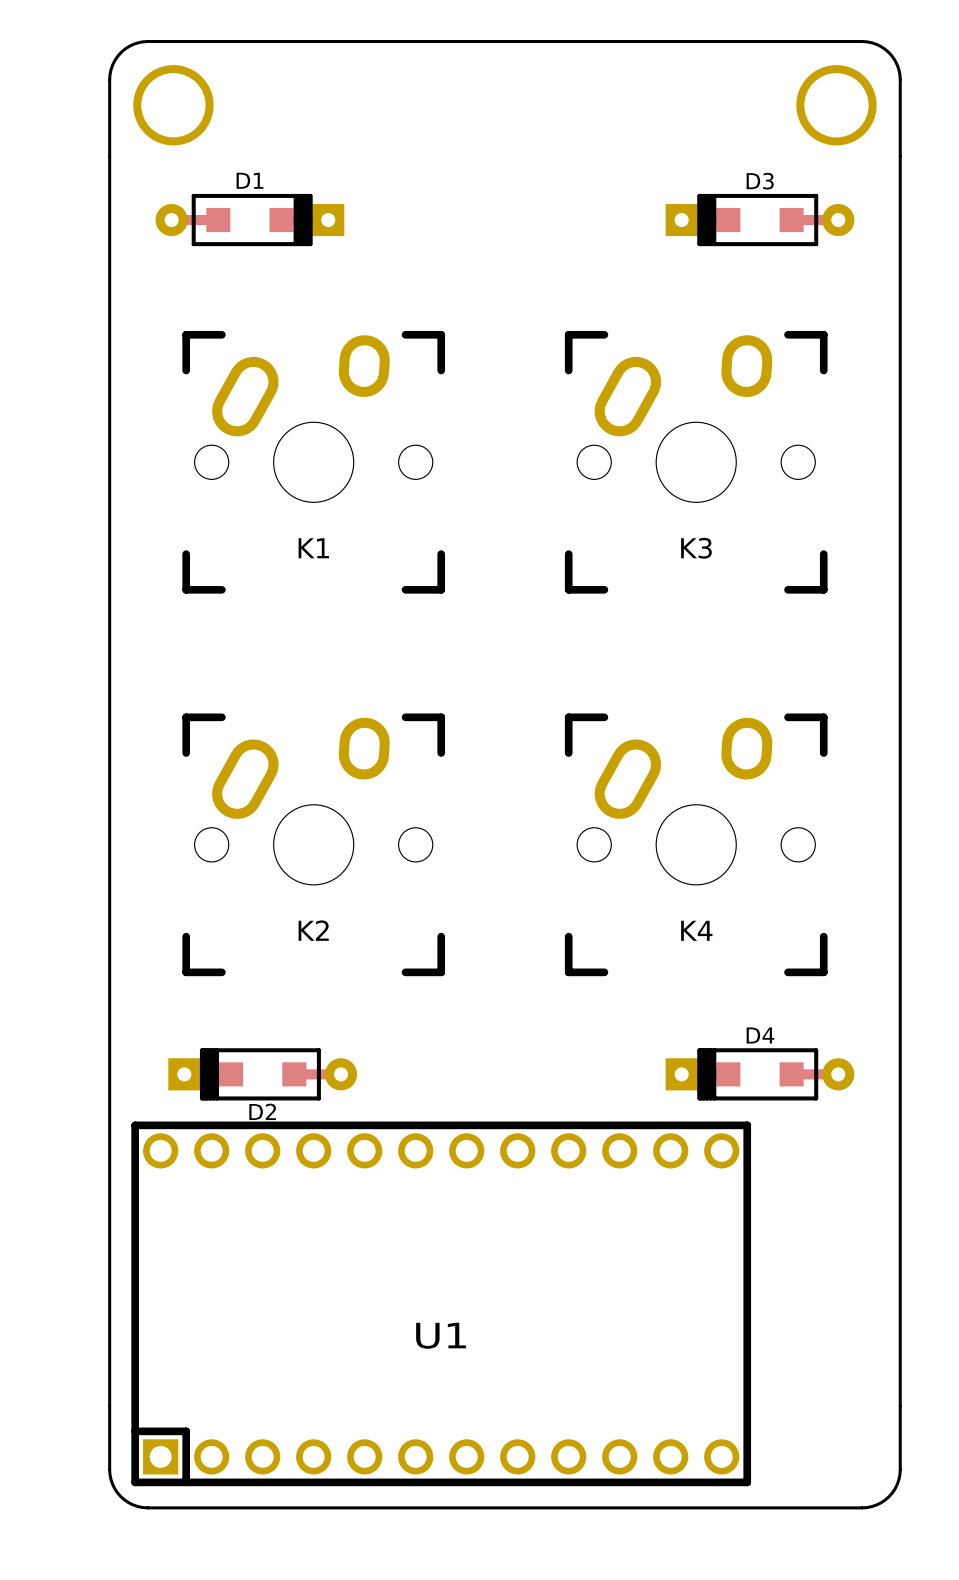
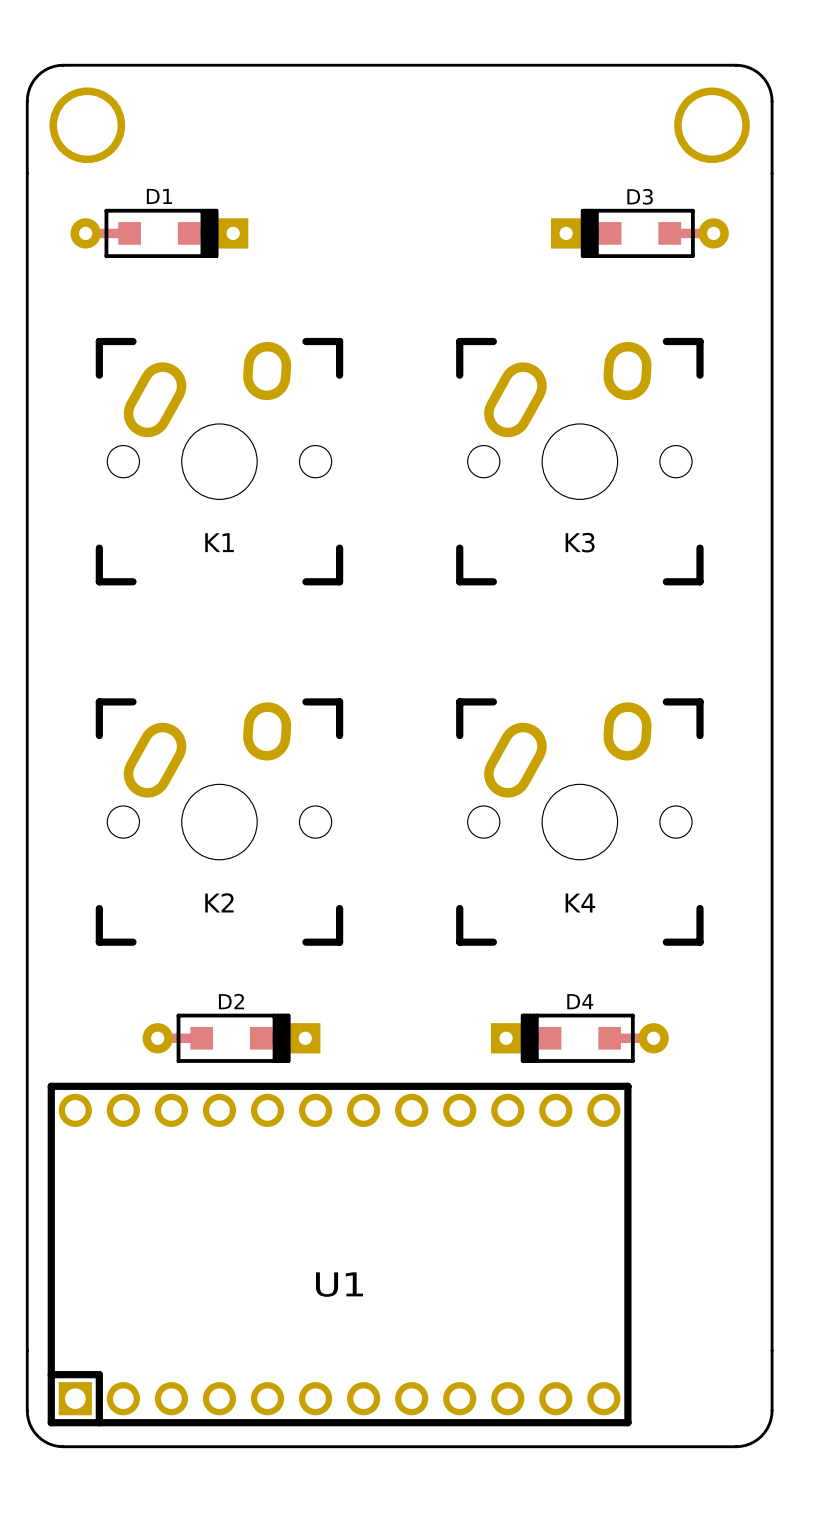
D2 rotation: 0° (262, 1074) -> 180° (231, 1038)
D4 position: (759, 1074) -> (579, 1038)

